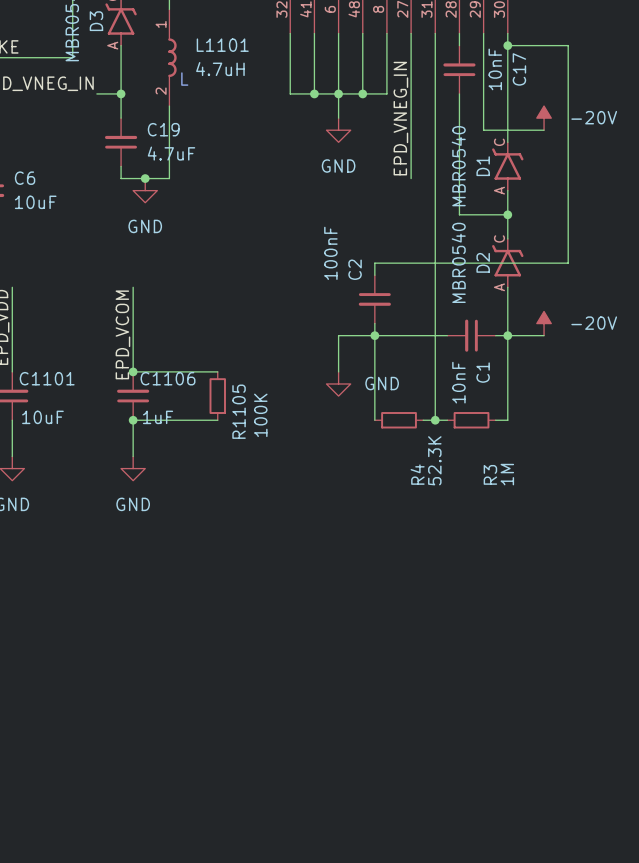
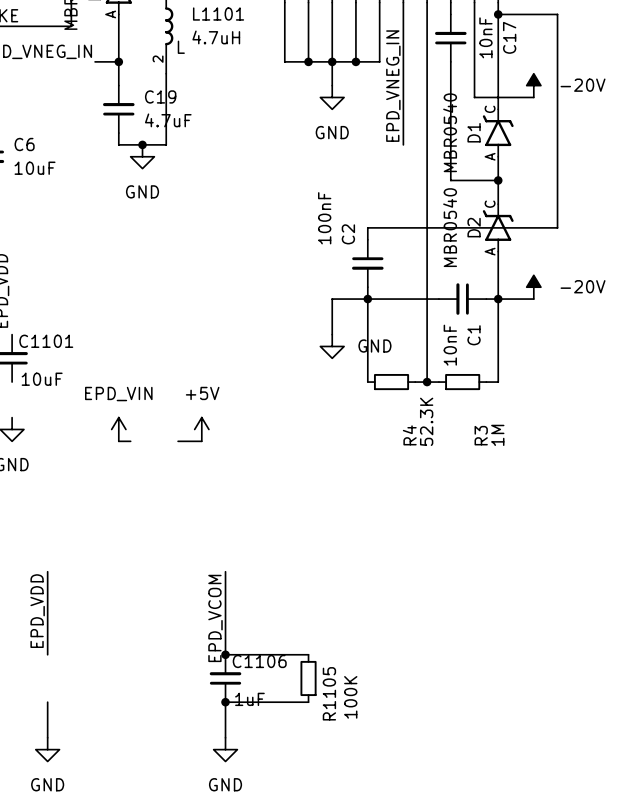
wire: (12, 287) (12, 371) -> none
wire: (133, 287) (133, 371) (217, 371) -> none
label: EPD_VCOM (122, 334) -> none
junction: (133, 371) -> none
C1106 position: (133, 396) -> (225, 678)
R1105 position: (217, 396) -> (308, 678)
wire: (12, 420) (12, 456) -> none
junction: (133, 420) -> none
wire: (217, 420) (133, 420) (133, 456) -> none
power symbol: none -> EPD_VIN (118, 429)
power symbol: GND (133, 468) -> none
power symbol: none -> +5V (201, 429)
wire: none -> (118, 441) (130, 441)
wire: none -> (178, 441) (201, 441)
wire: none -> (47, 571) (47, 654)
wire: none -> (225, 571) (225, 654) (308, 654)
label: none -> EPD_VDD (37, 611)
label: none -> EPD_VCOM (215, 618)
junction: none -> (225, 654)
wire: none -> (47, 702) (47, 737)
junction: none -> (225, 702)
wire: none -> (308, 702) (225, 702) (225, 737)
power symbol: none -> GND (47, 749)
power symbol: none -> GND (225, 749)

